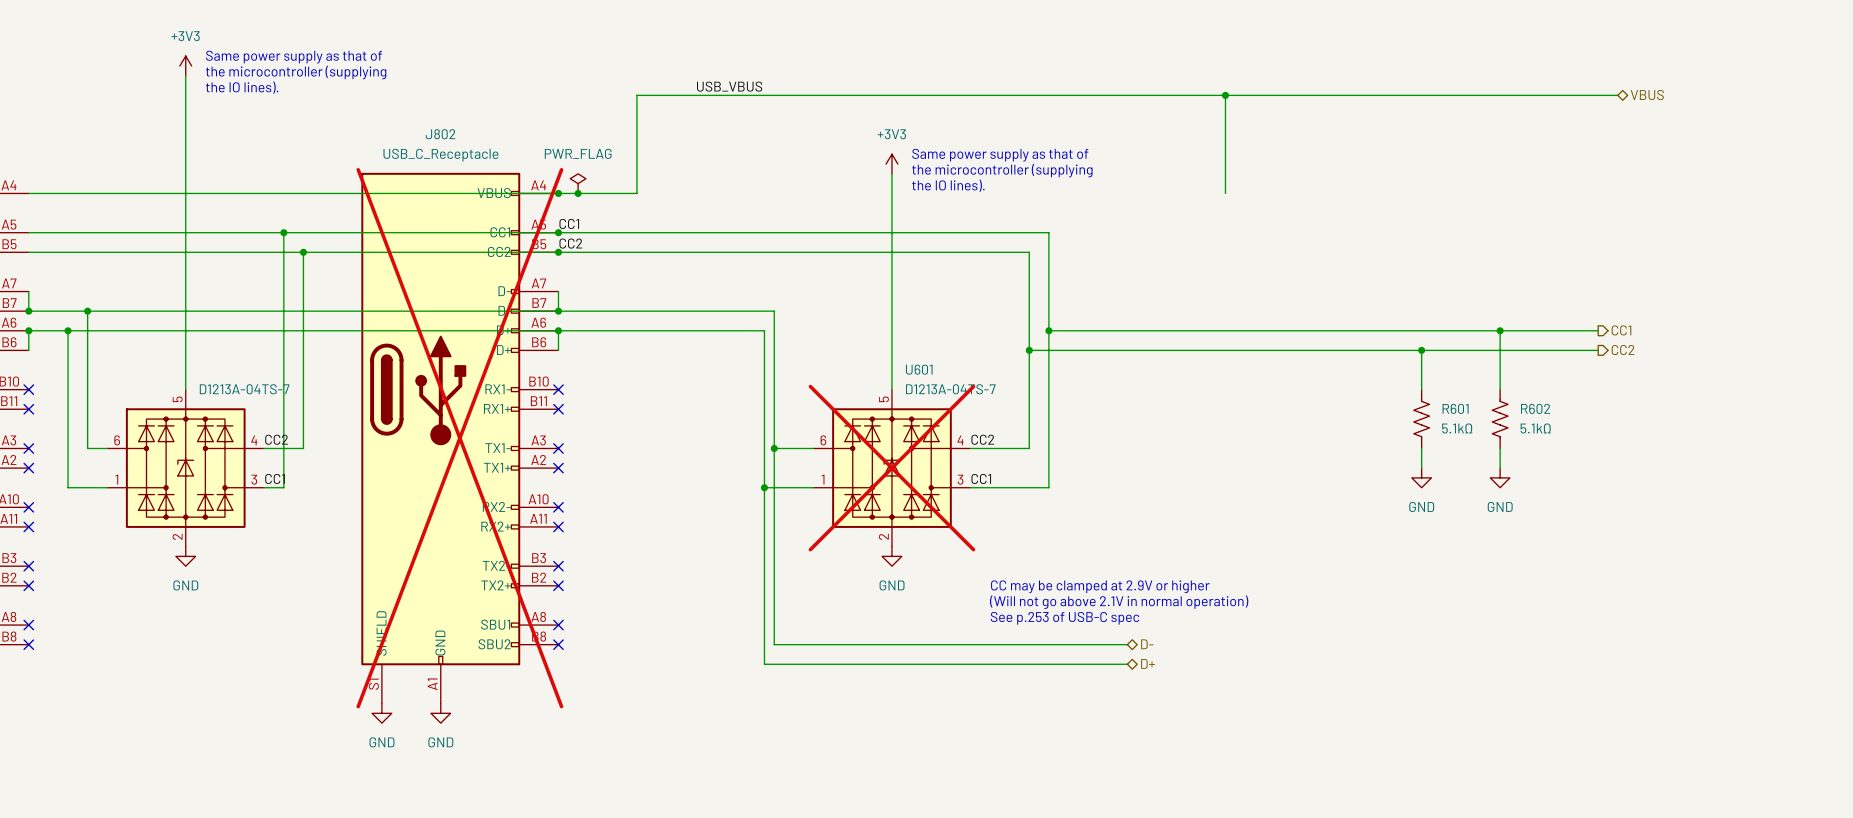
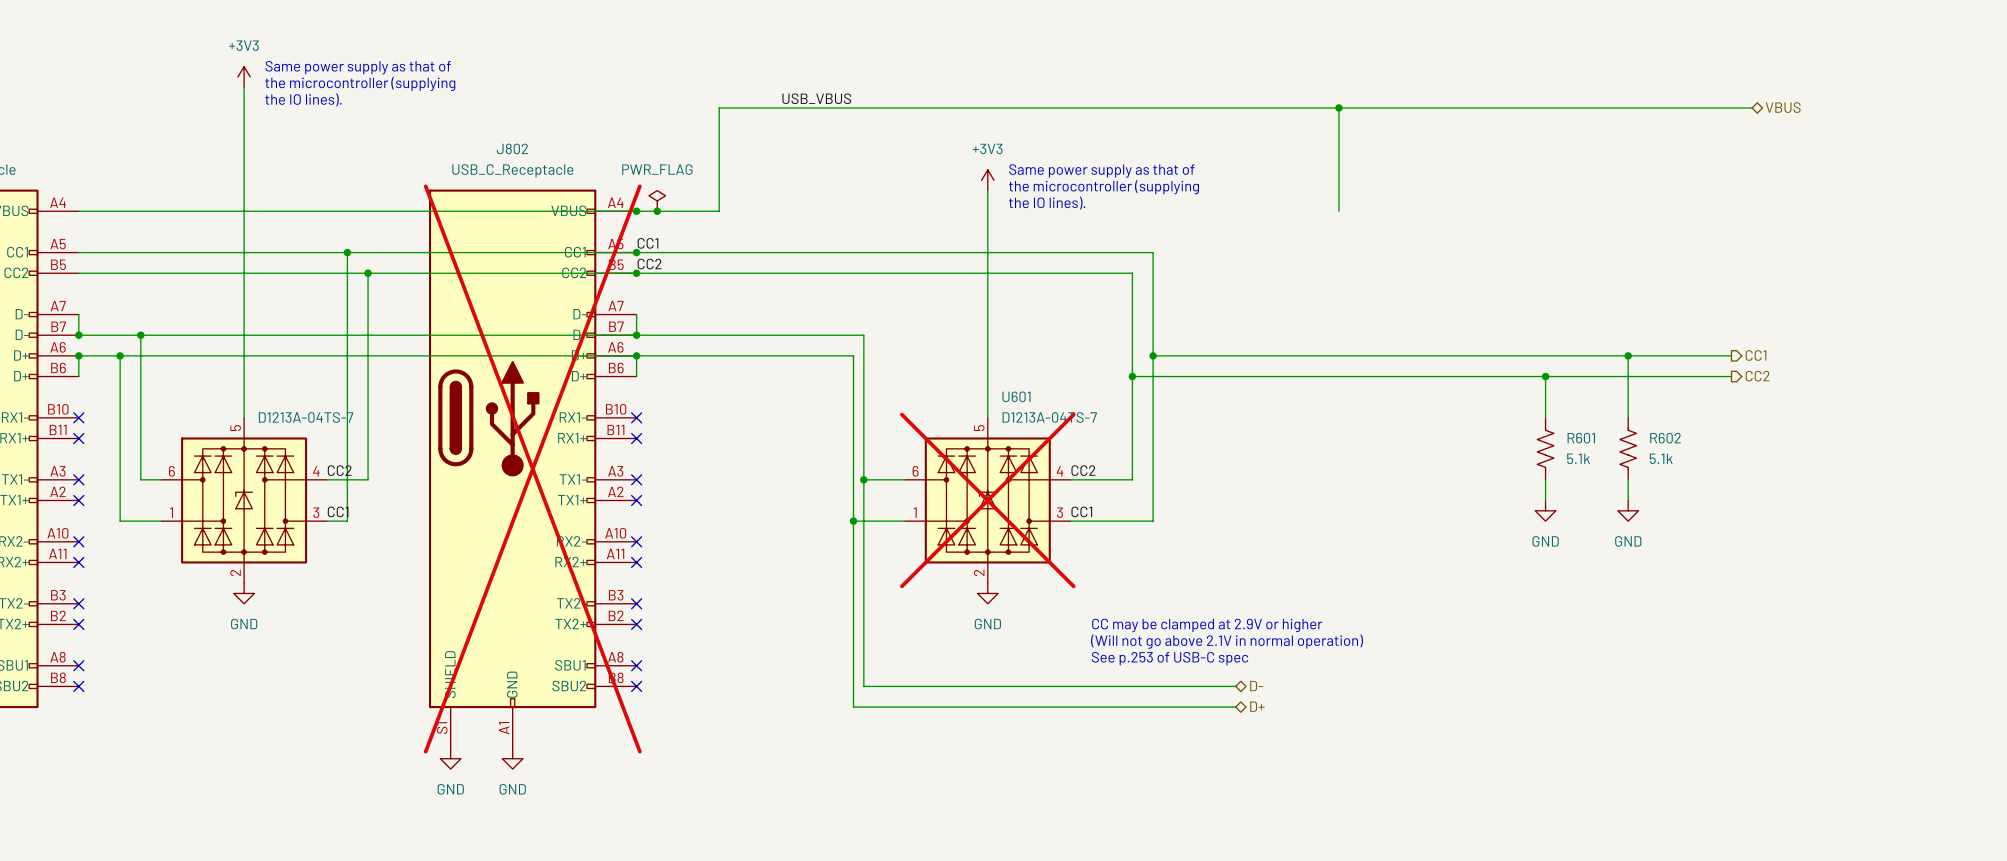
R601 value: 5.1kΩ (1457, 428) -> 5.1k (1578, 458)
R602 value: 5.1kΩ (1535, 428) -> 5.1k (1661, 458)

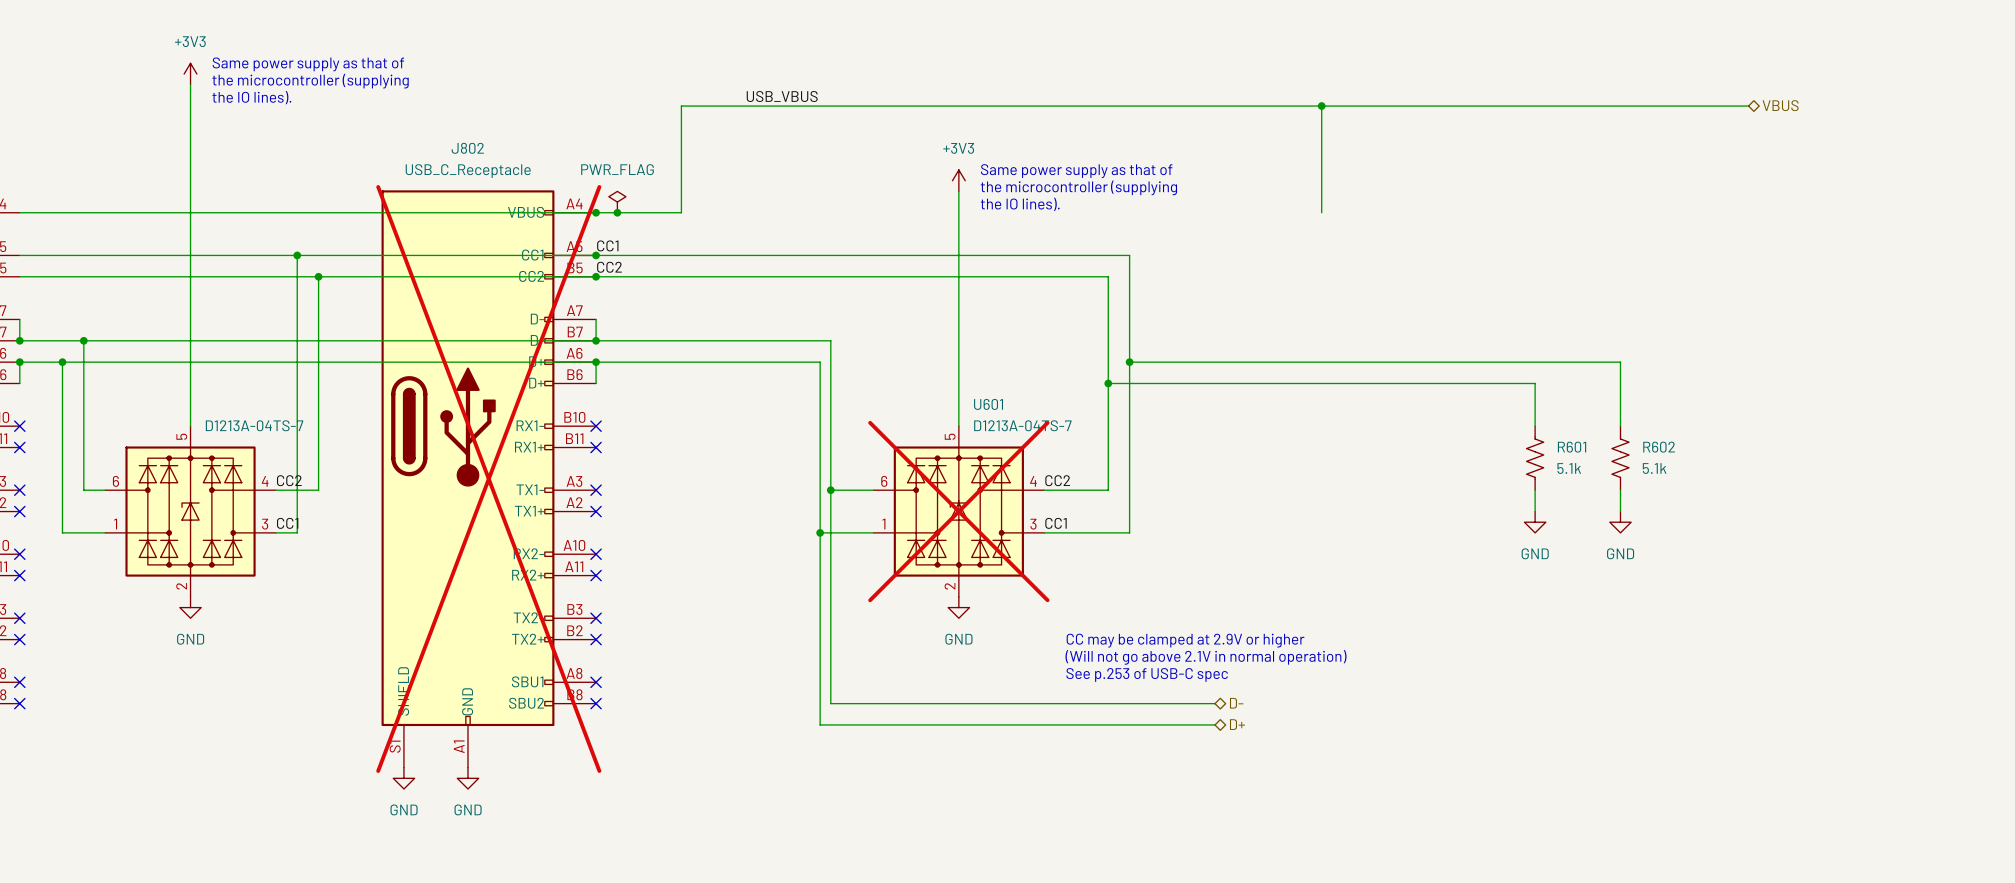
wire: (1628, 355) (1731, 355) -> none
junction: (1628, 355) -> none
hierarchical label: CC1 (1755, 355) -> none
wire: (1545, 376) (1731, 376) -> none
junction: (1545, 376) -> none
hierarchical label: CC2 (1757, 376) -> none

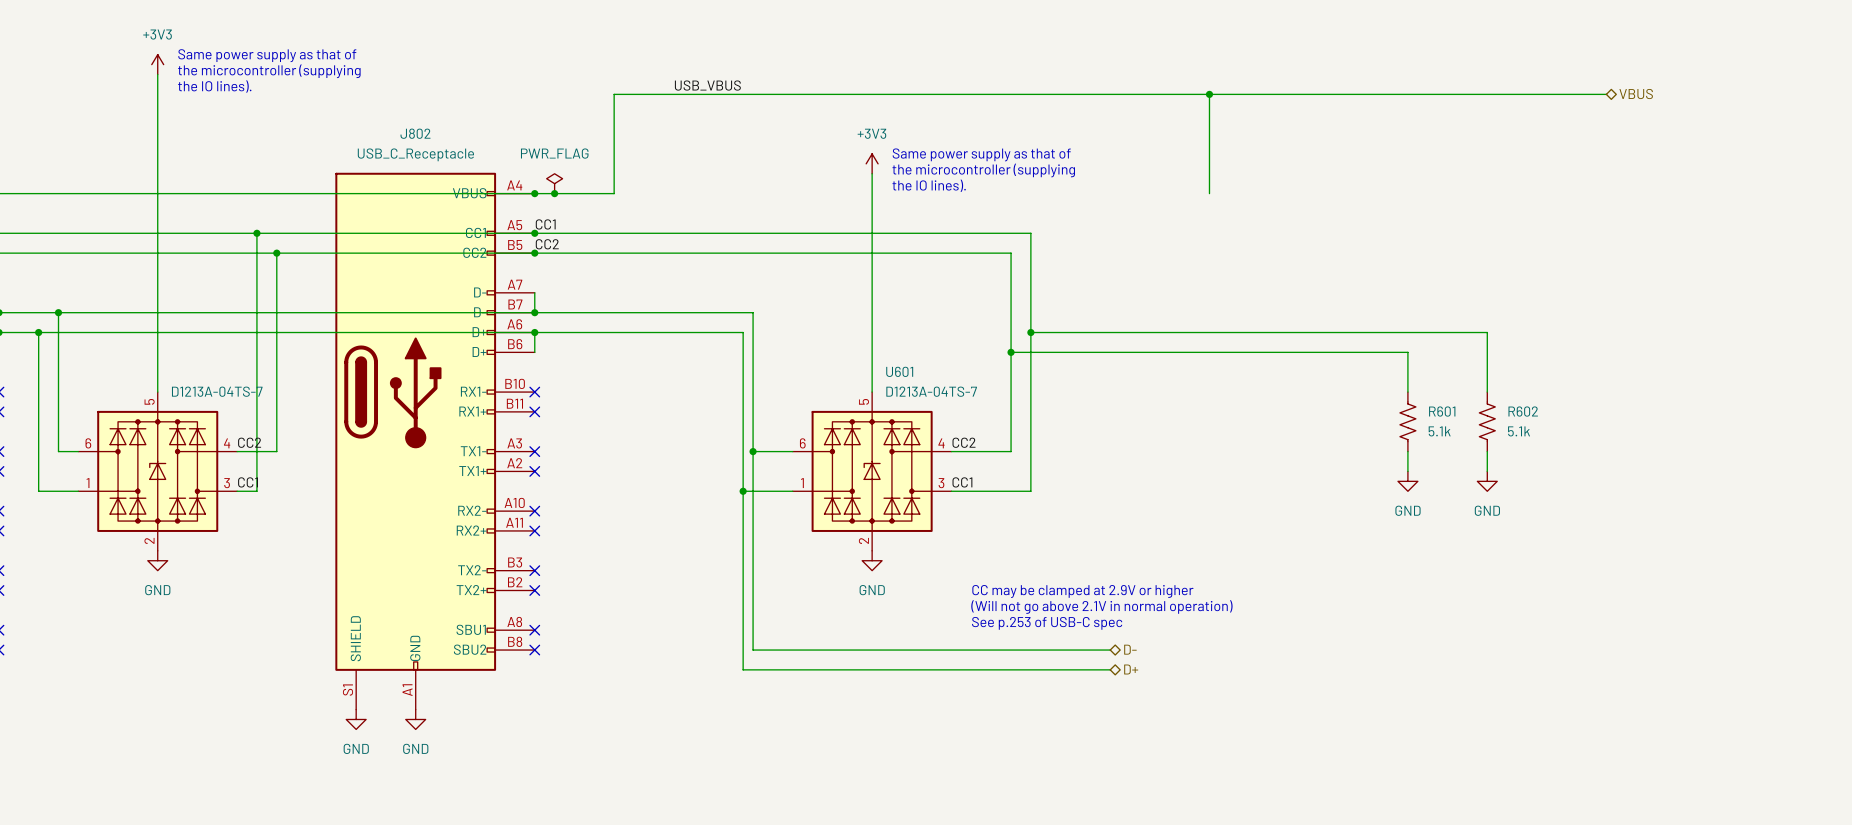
J802 do-not-place cross: (488, 479) -> none
U601 do-not-place cross: (958, 511) -> none

